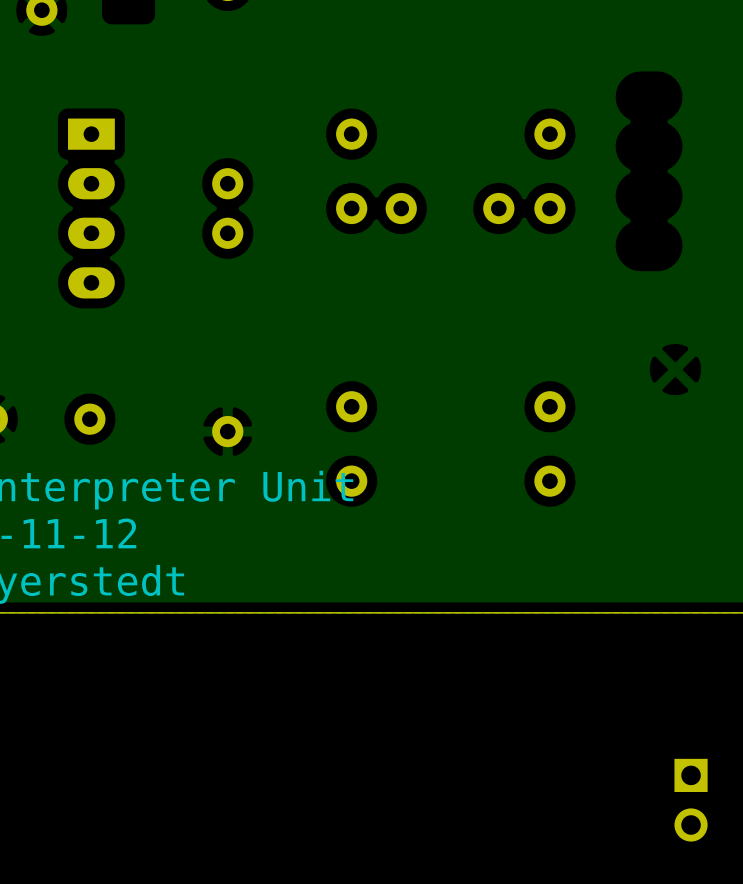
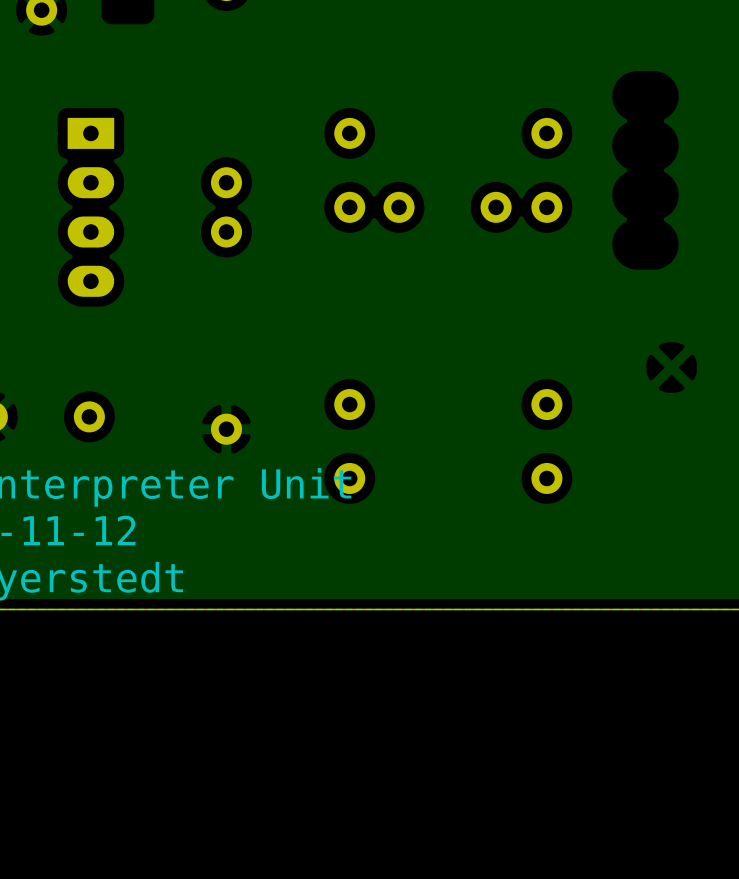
part: (691, 800) -> none

